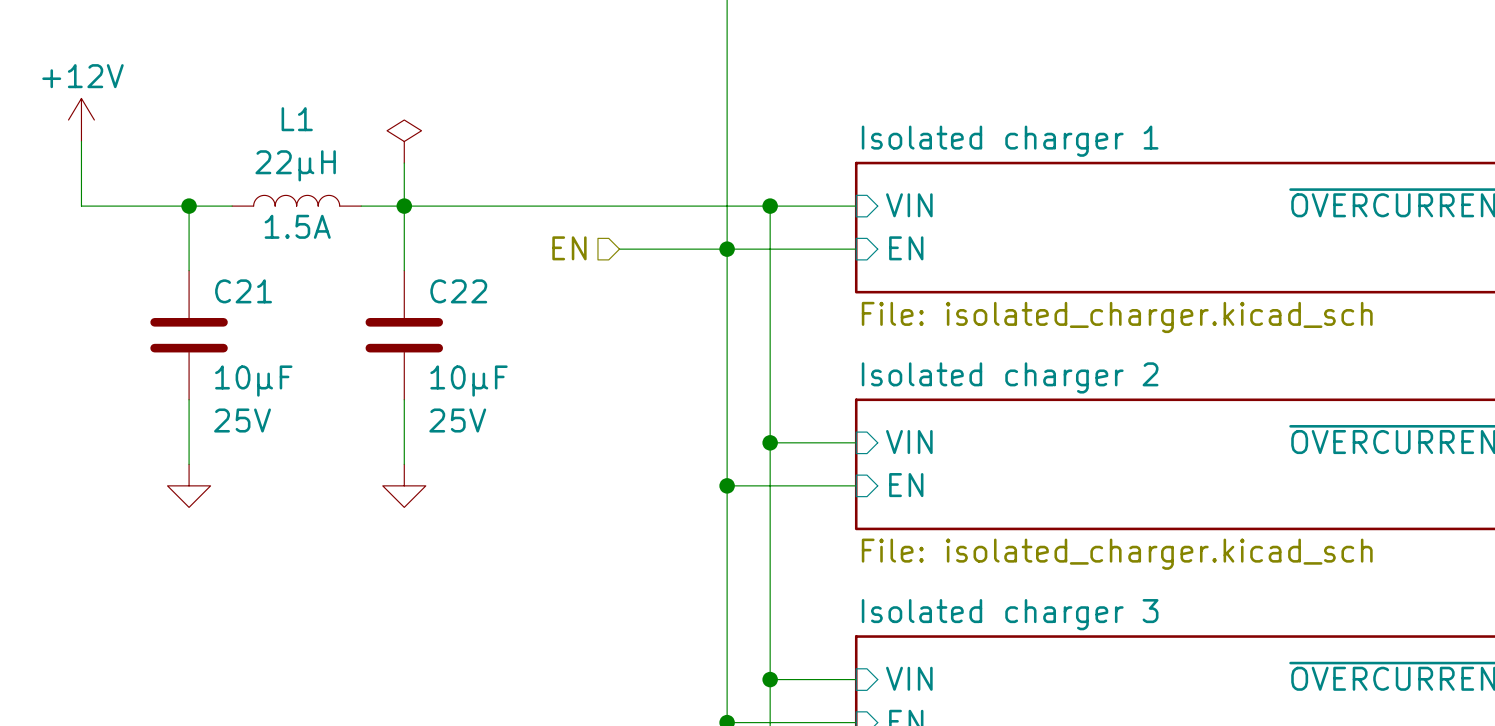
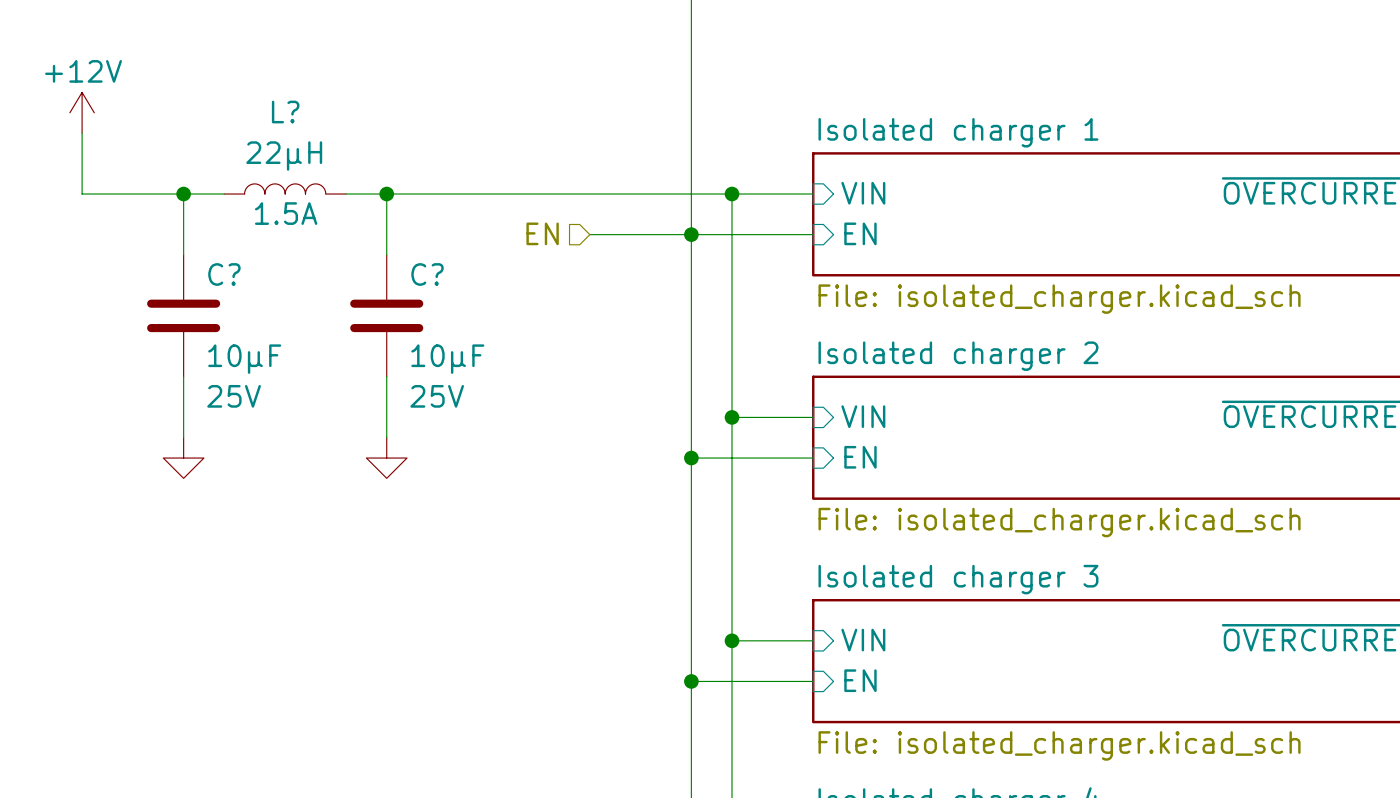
L1 name: L1 (297, 119) -> L? (285, 112)
power symbol: (404, 141) -> none
wire: (404, 163) (404, 206) -> none
C21 name: C21 (243, 291) -> C? (224, 274)
C22 name: C22 (458, 291) -> C? (427, 274)

